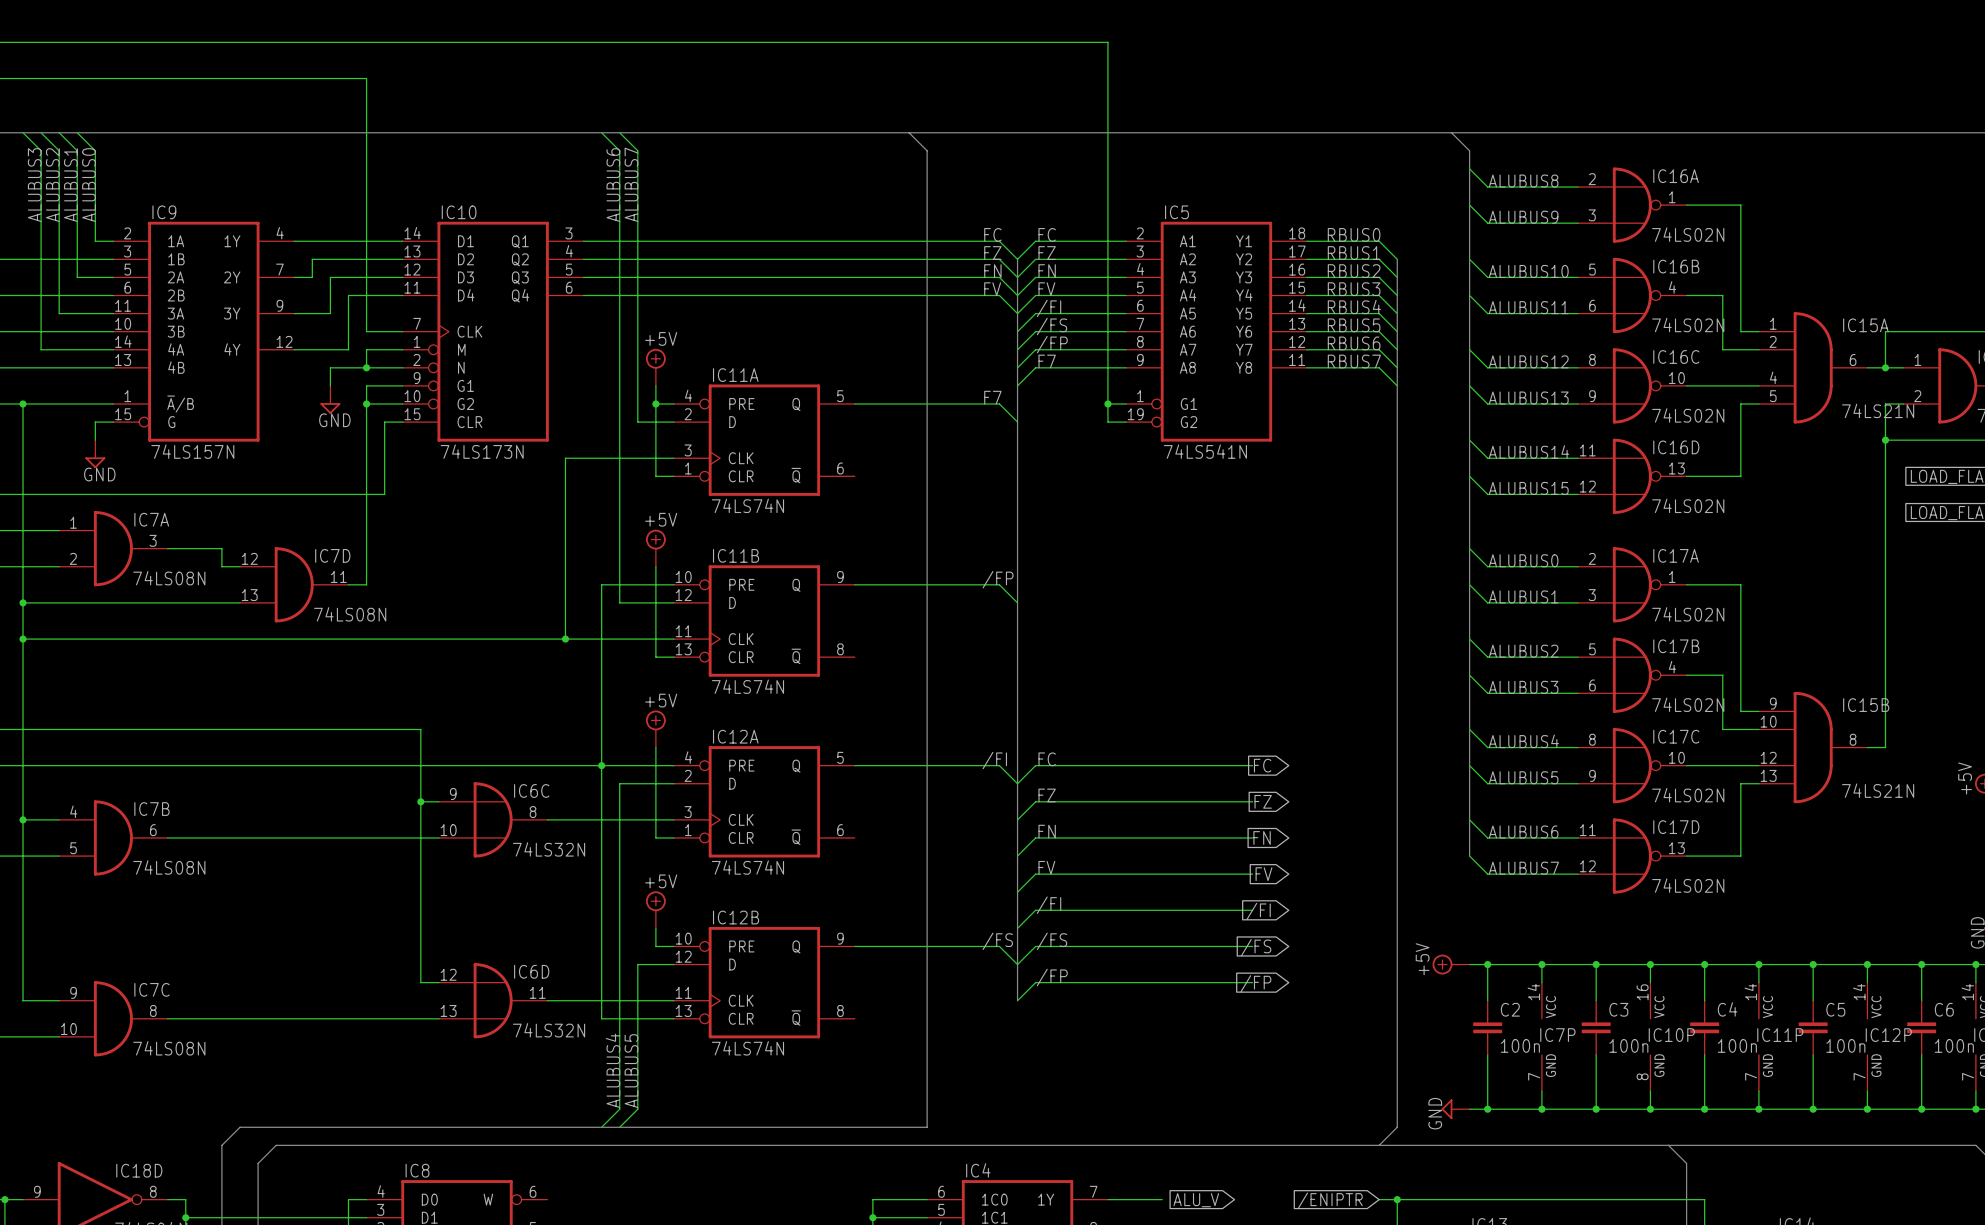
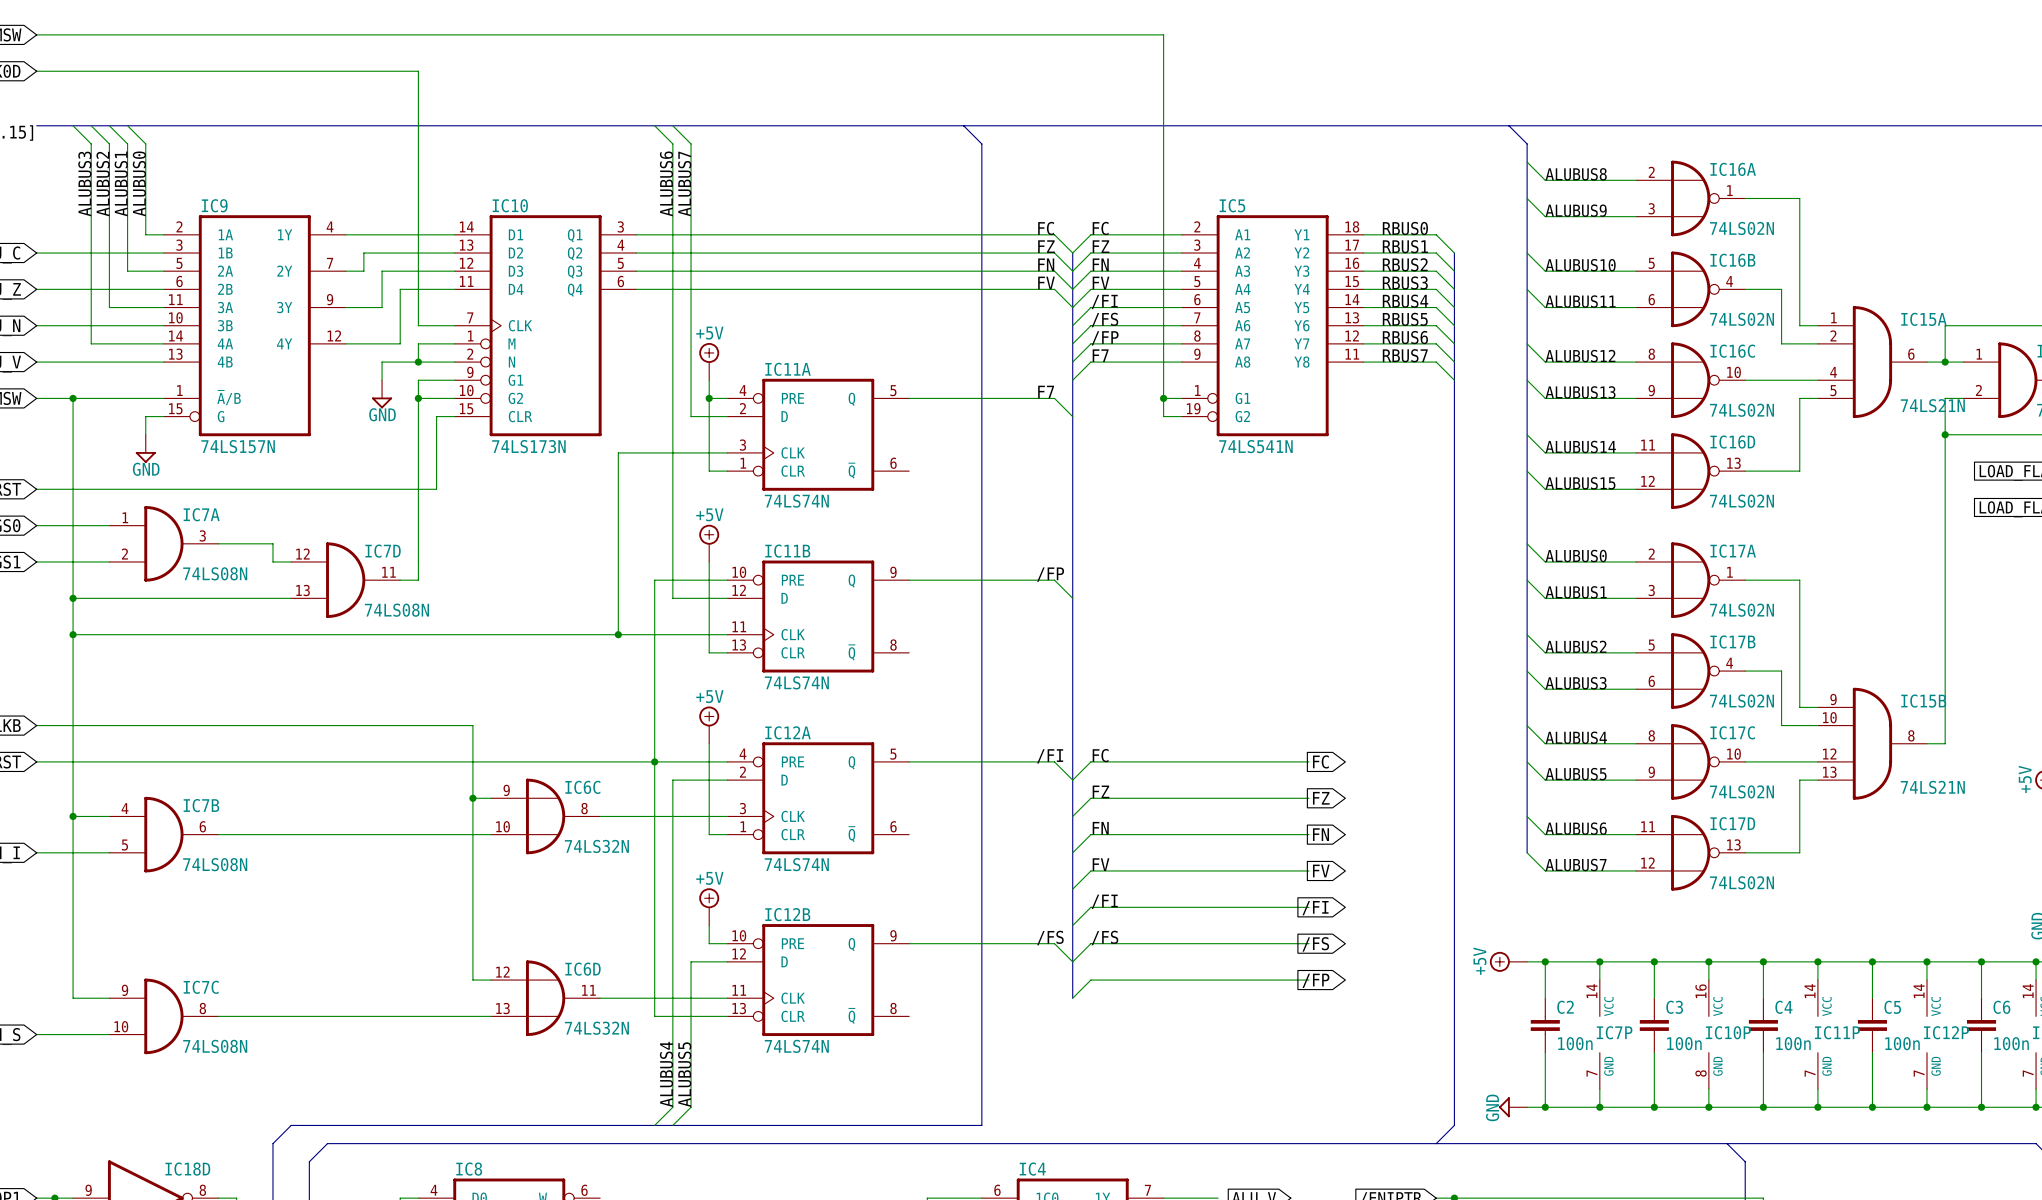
label: /FP (1052, 977) -> none

